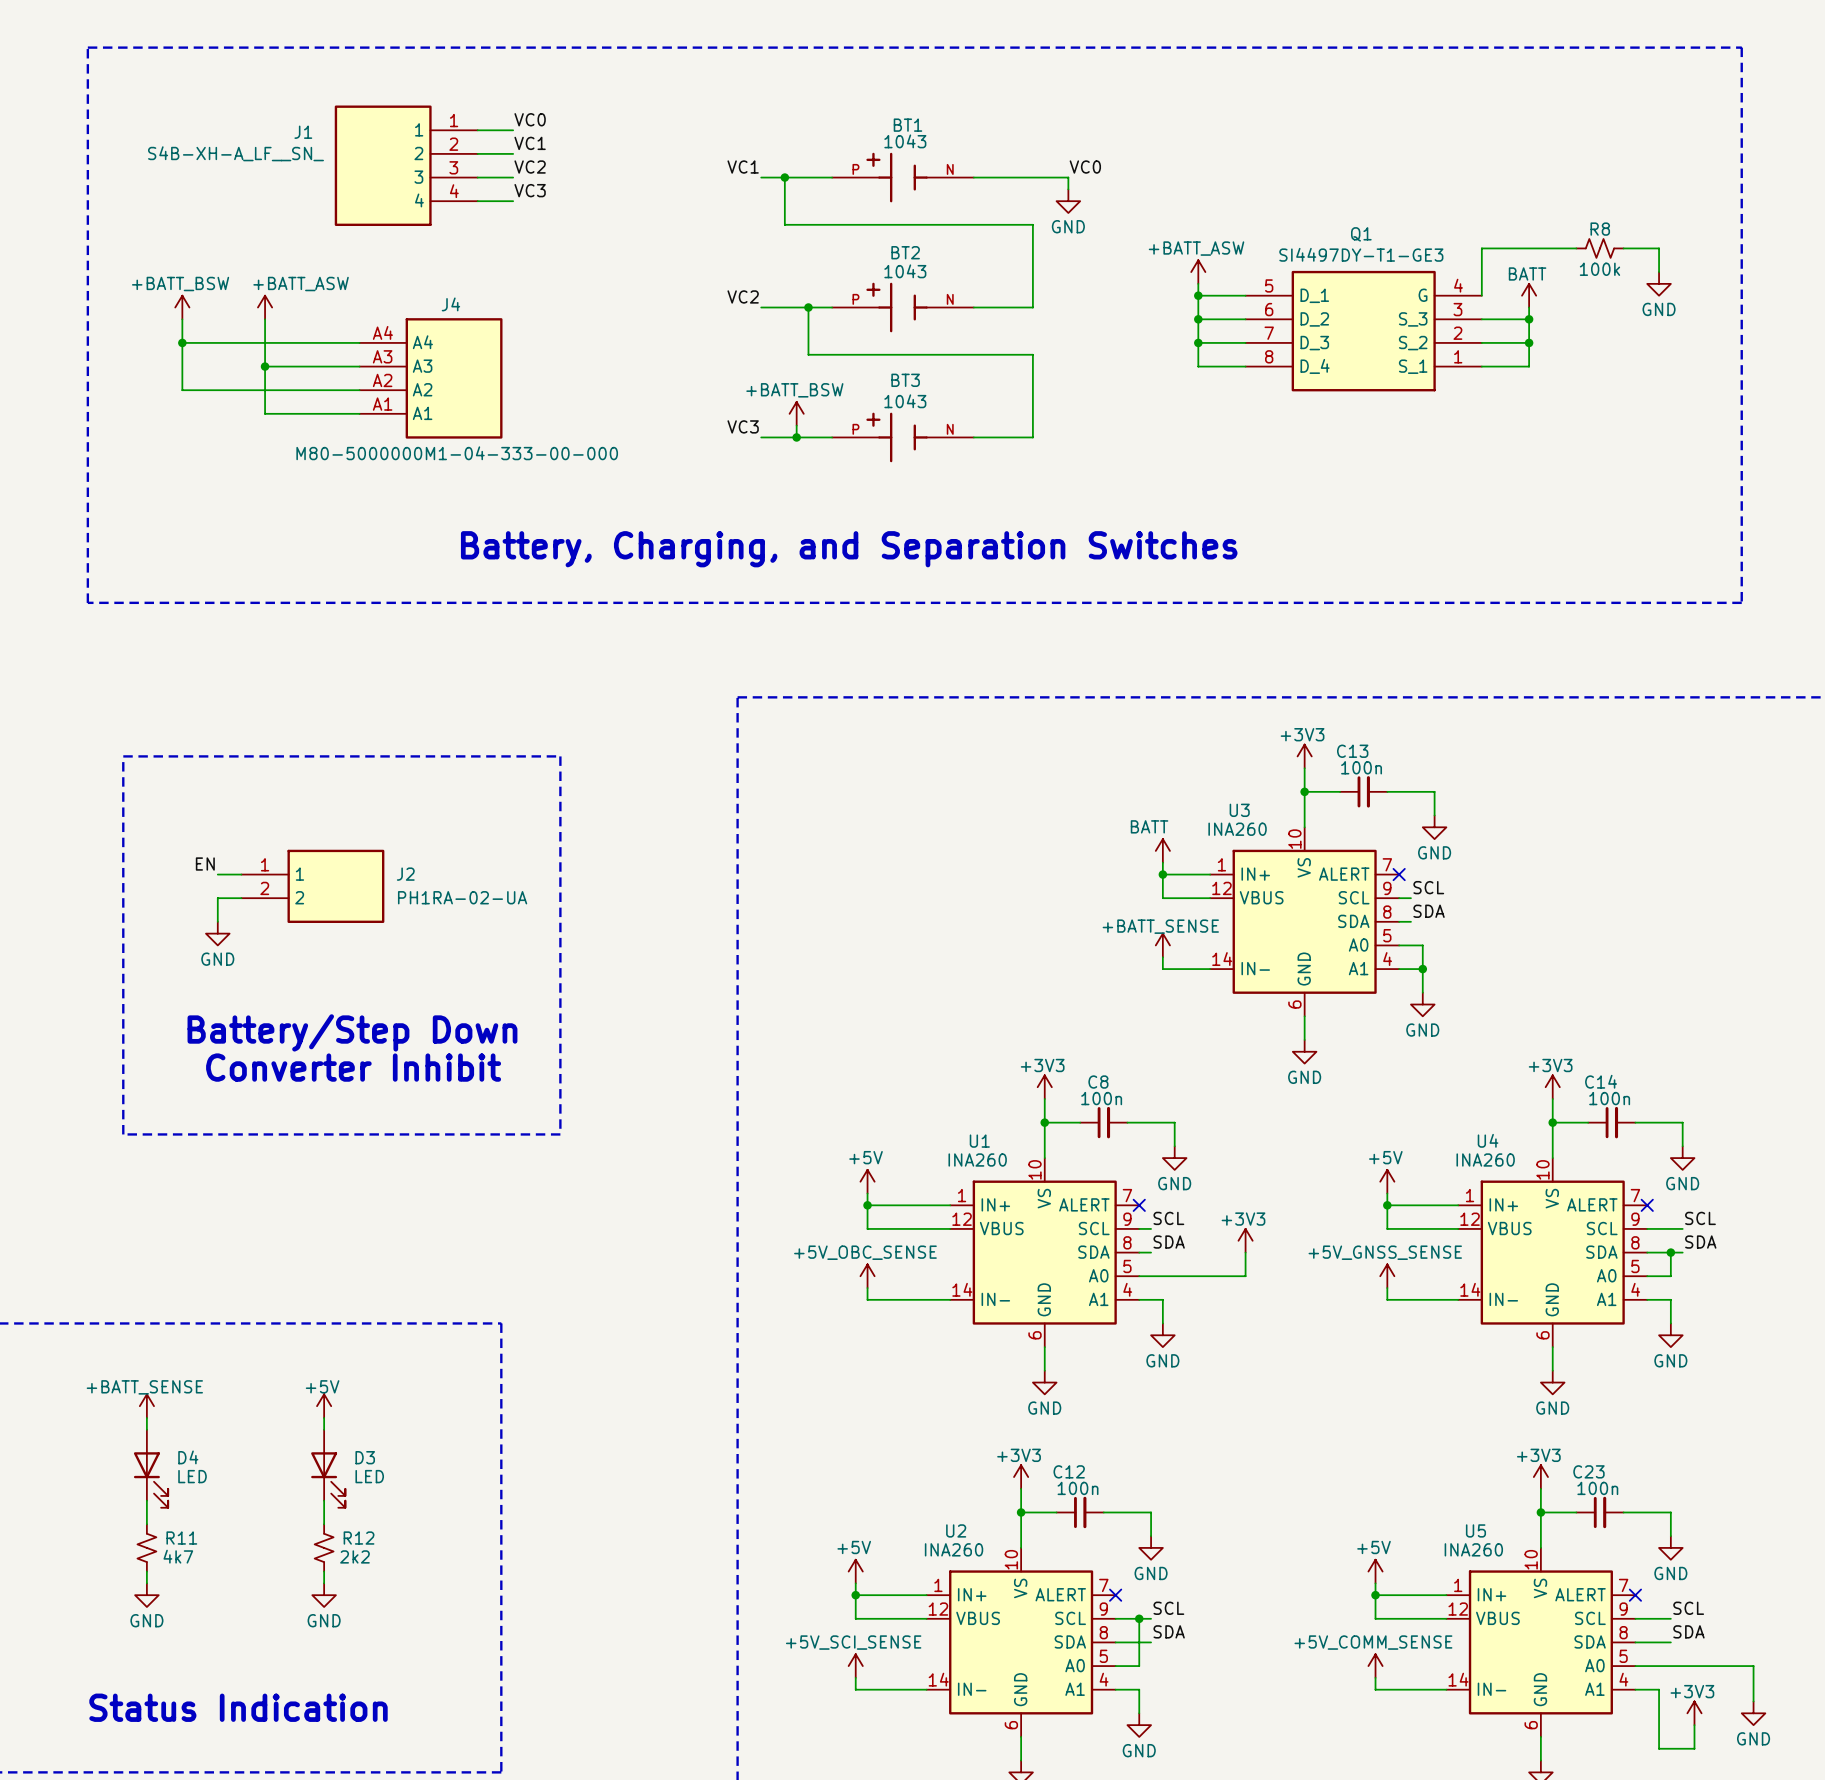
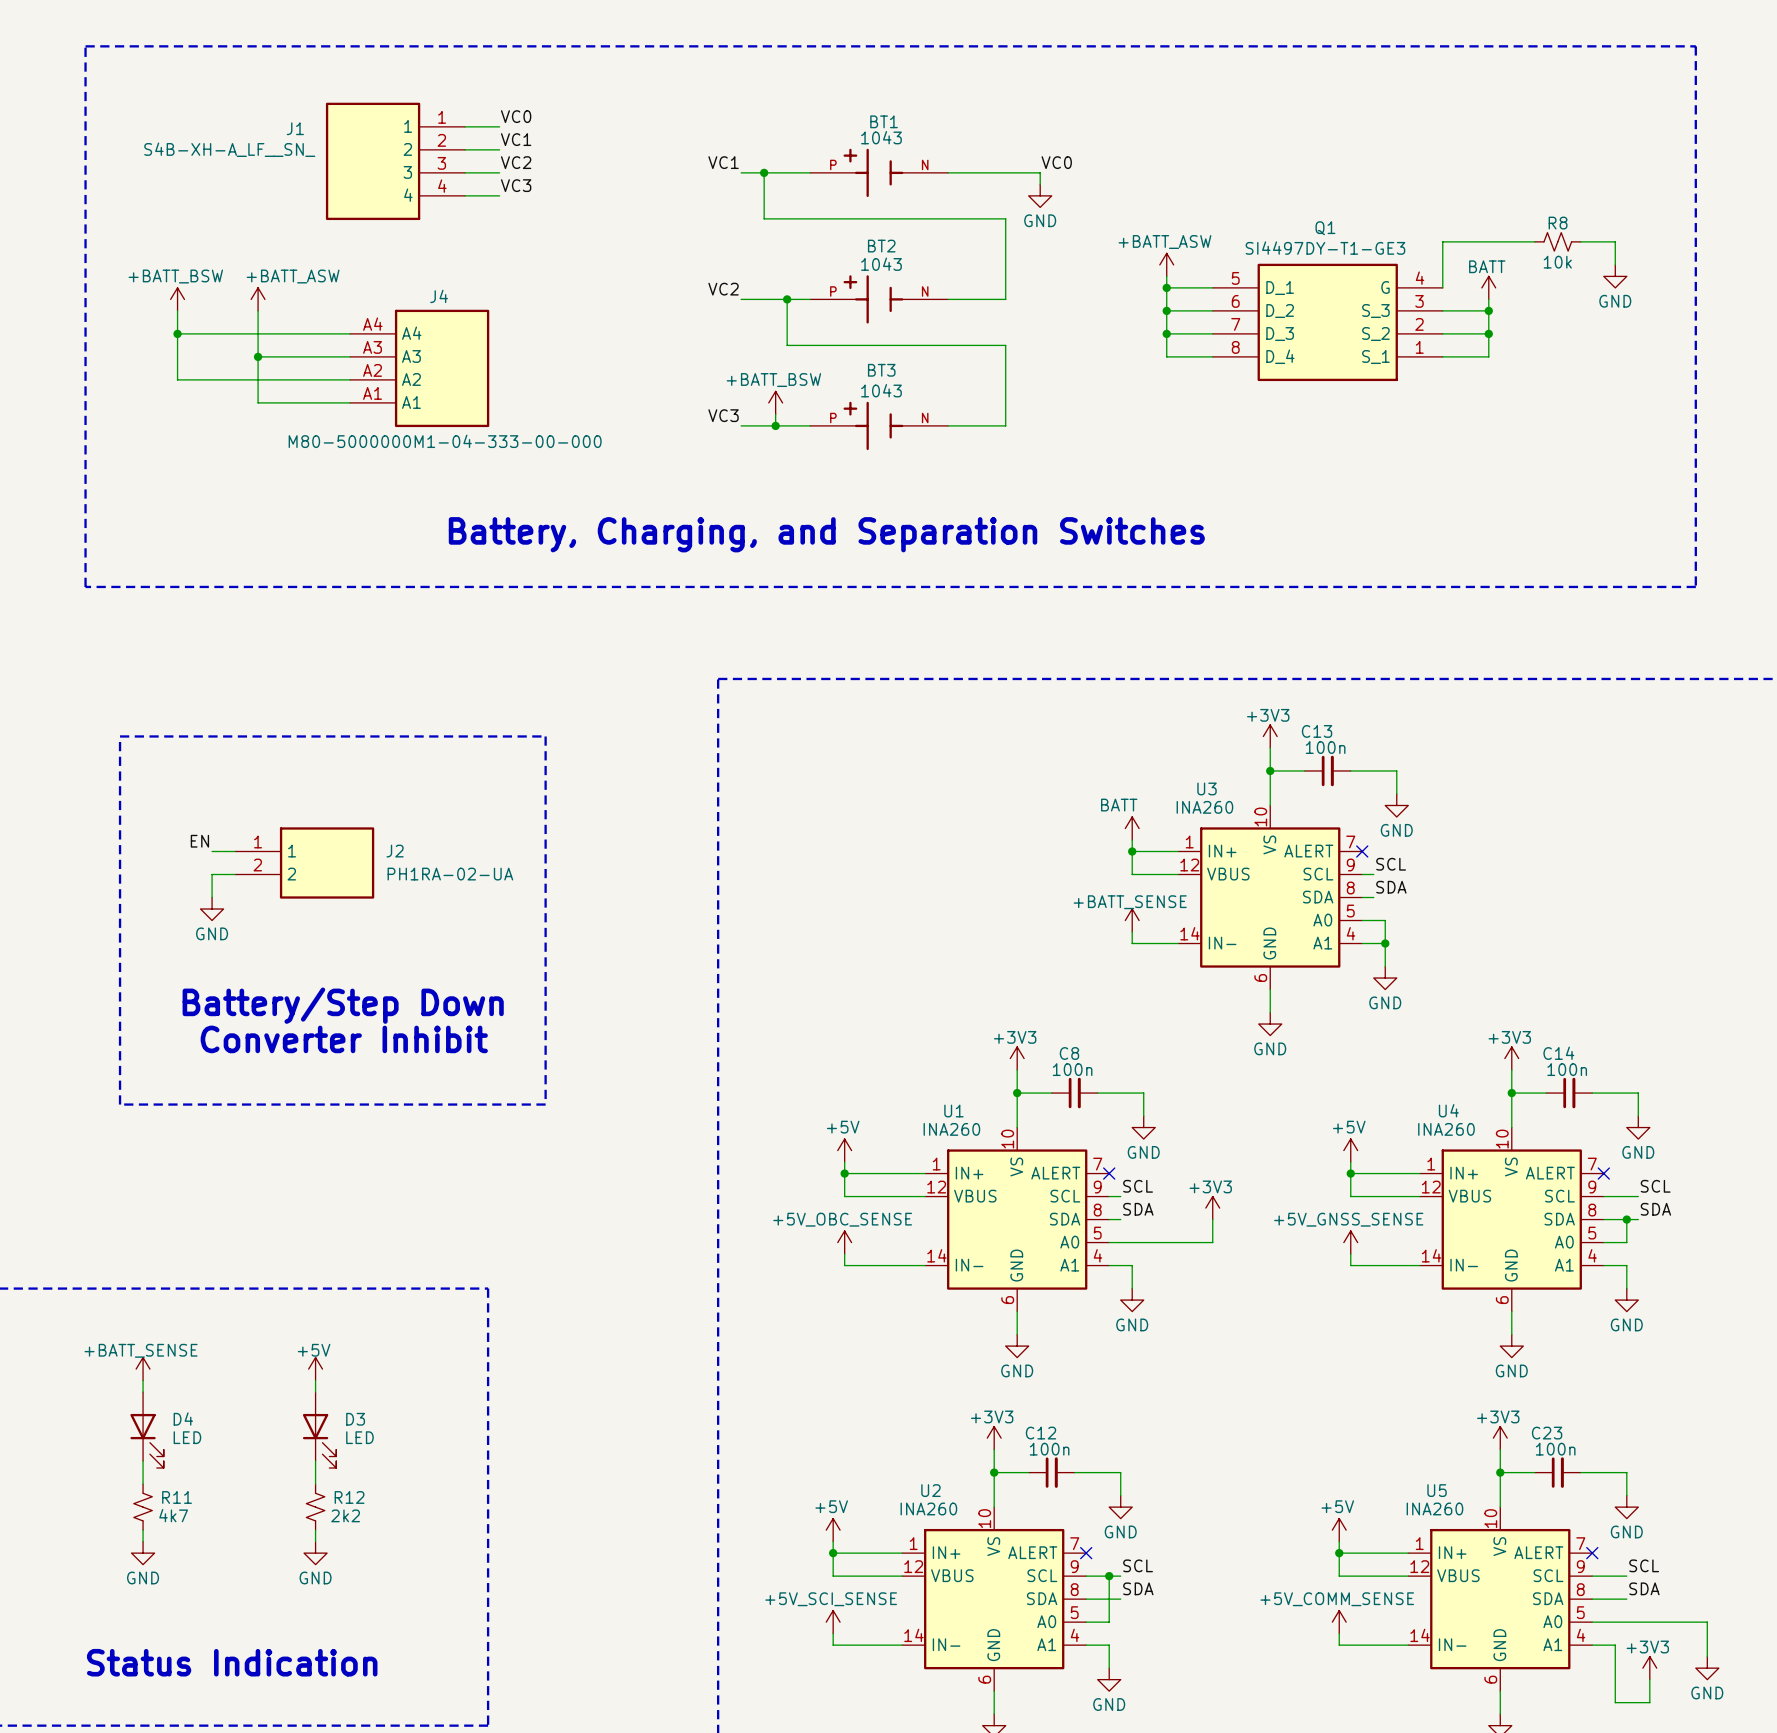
R8 value: 100k (1599, 269) -> 10k (1557, 262)

